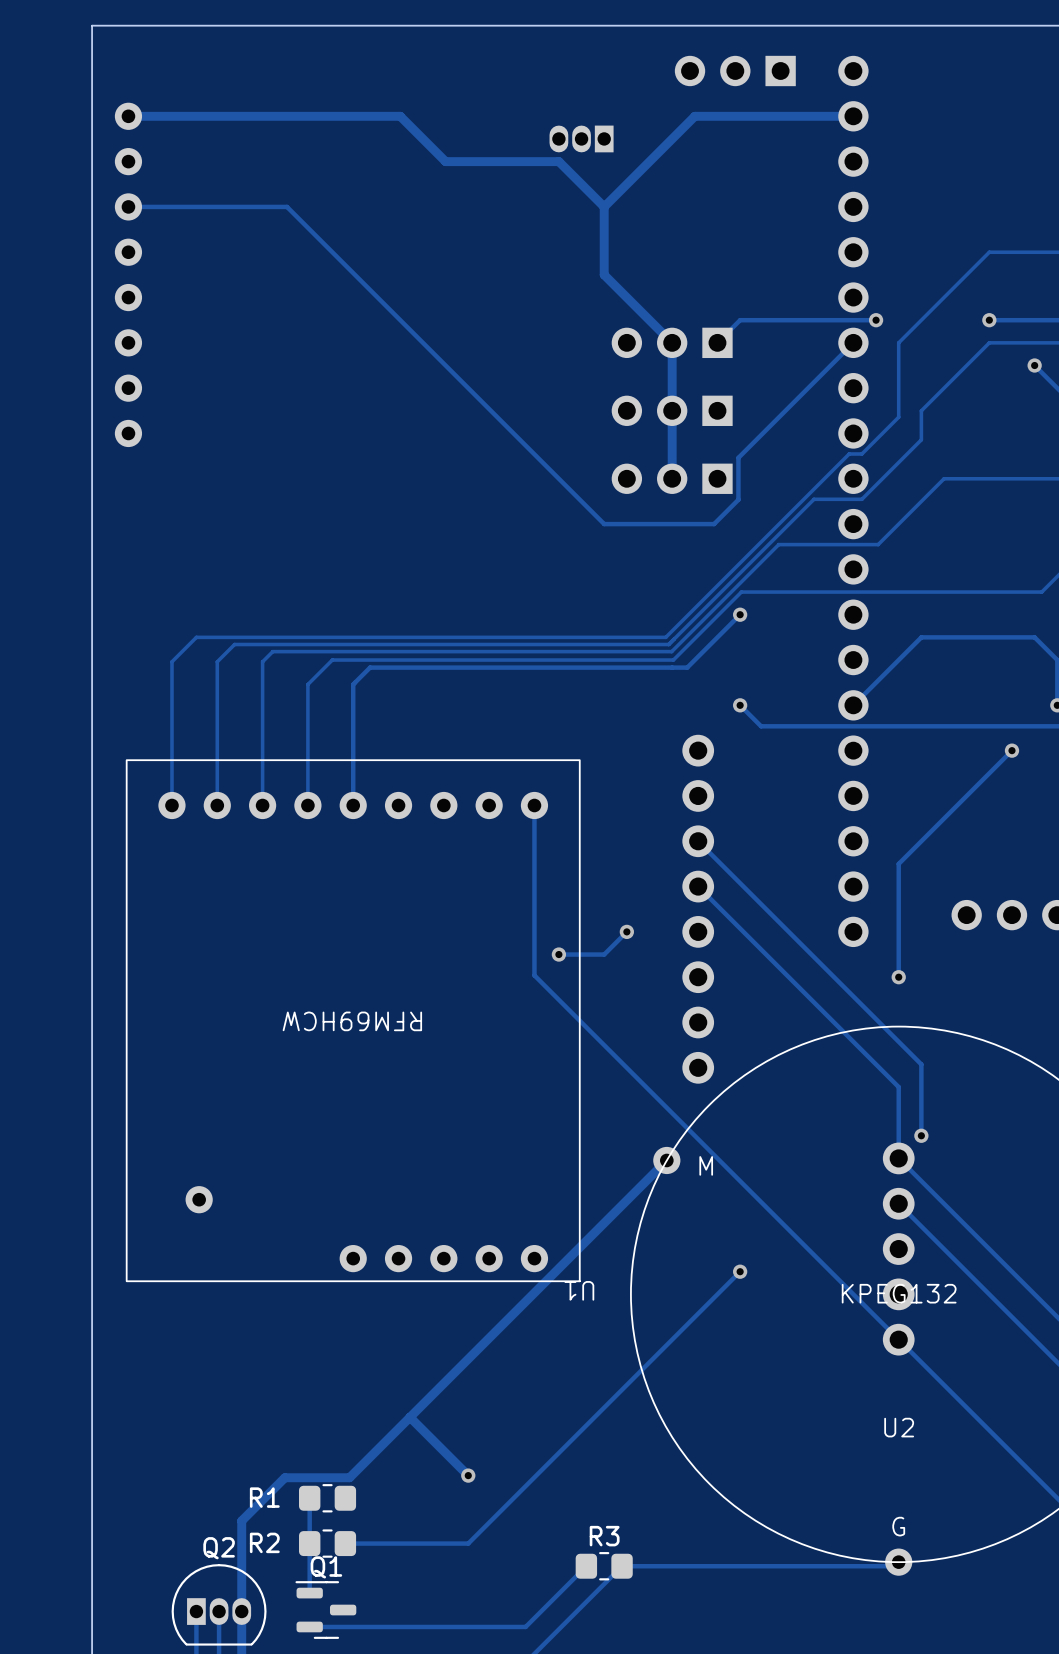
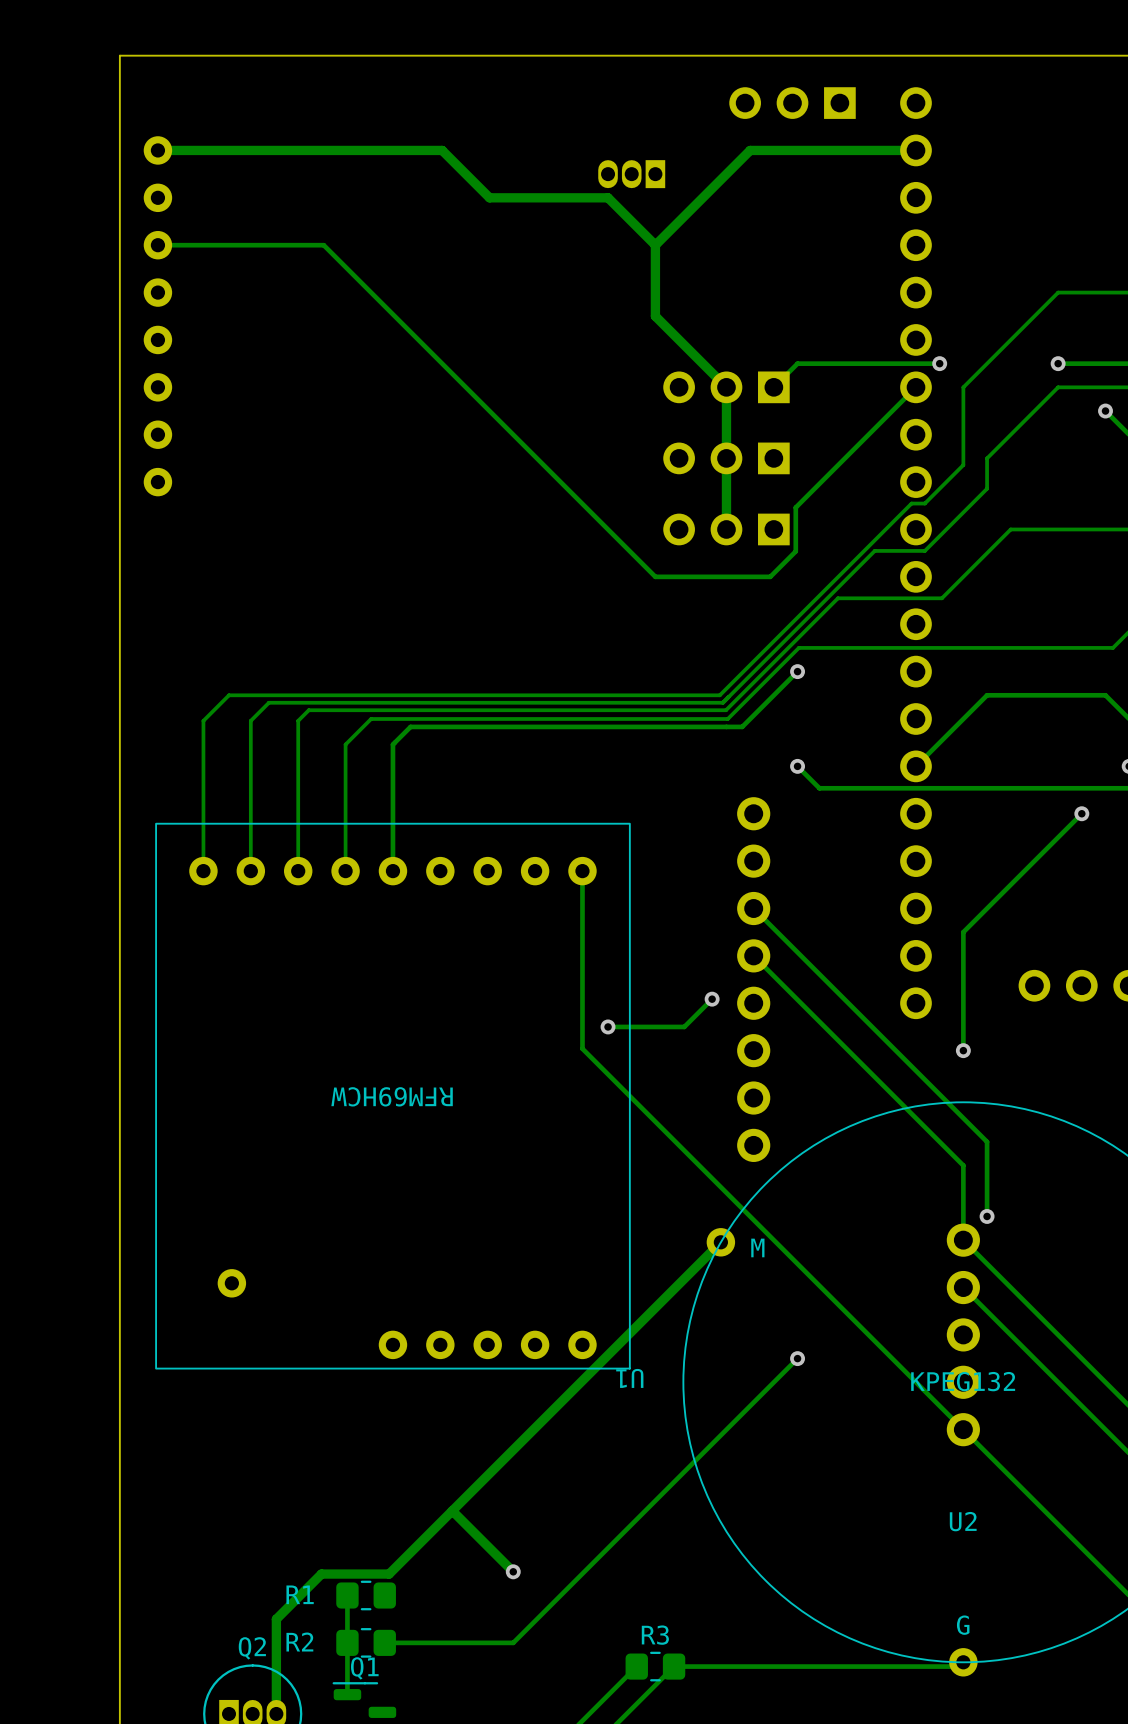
track: (626, 931) (604, 954) -> (712, 999) (684, 1026) (655, 1026)
via position: (626, 931) -> (712, 999)

